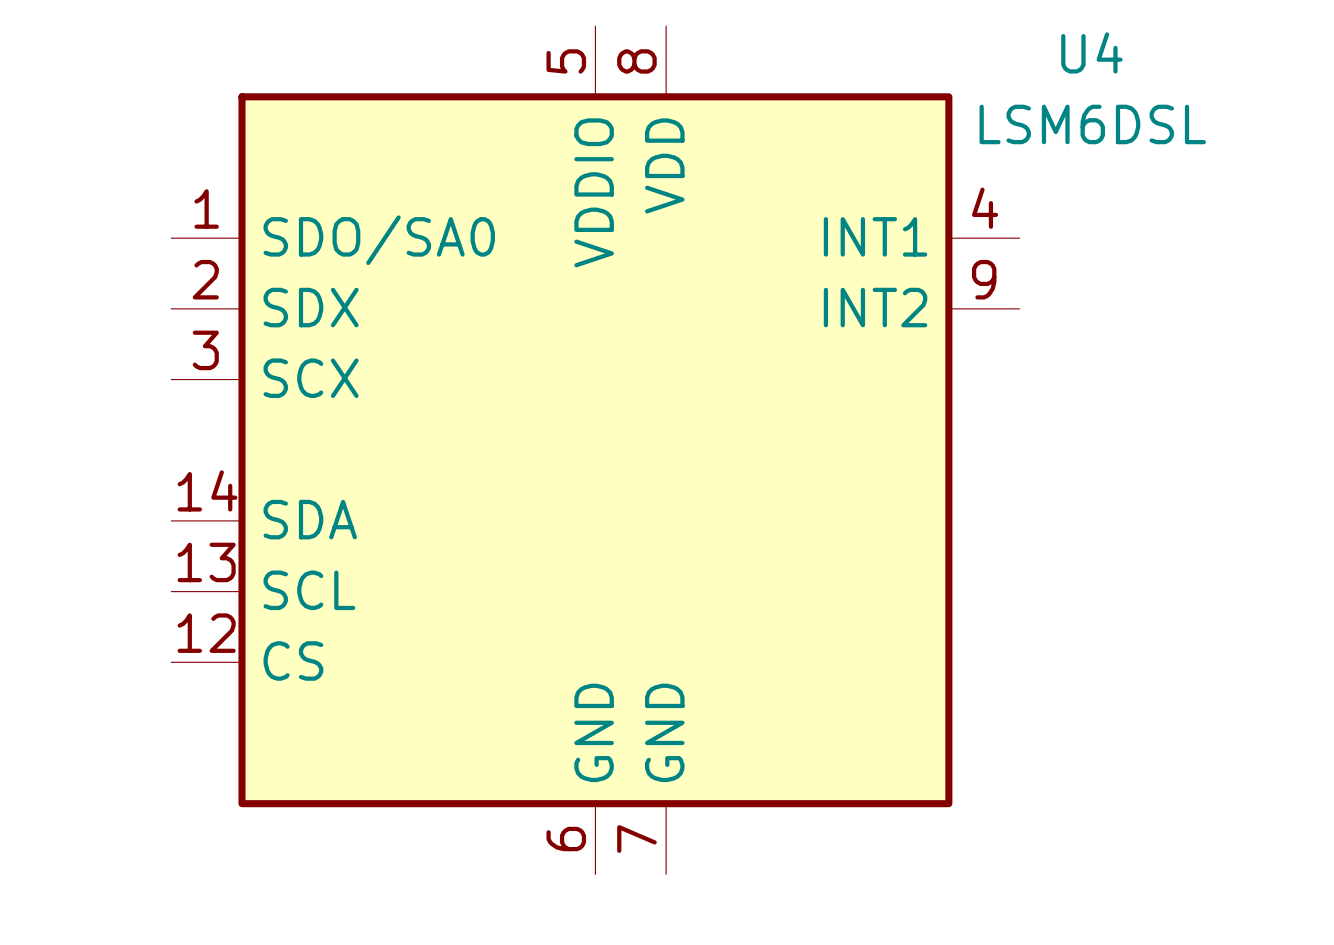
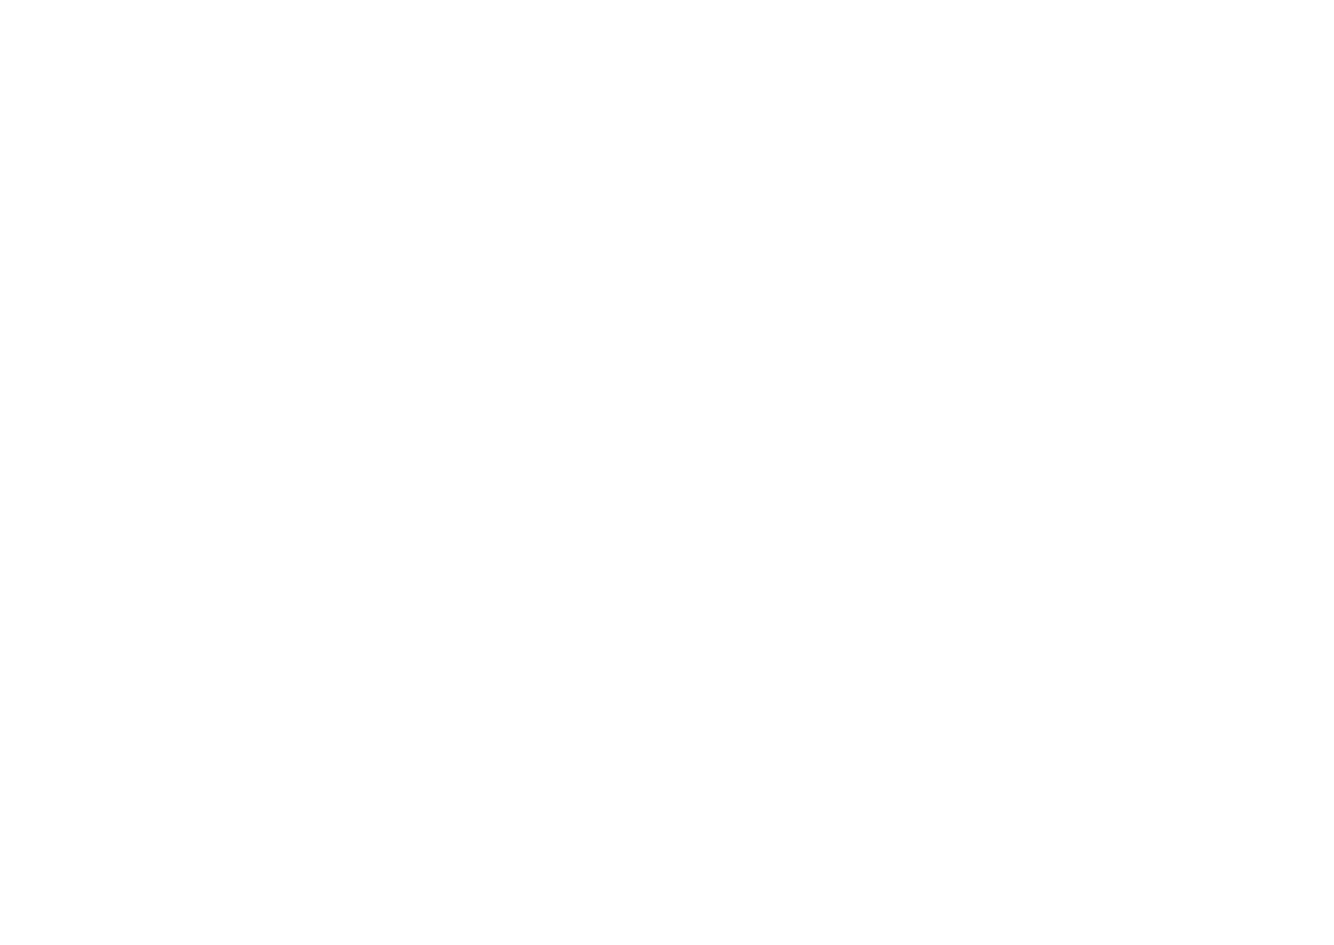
U4: LSM6DSL (595, 450) -> none

